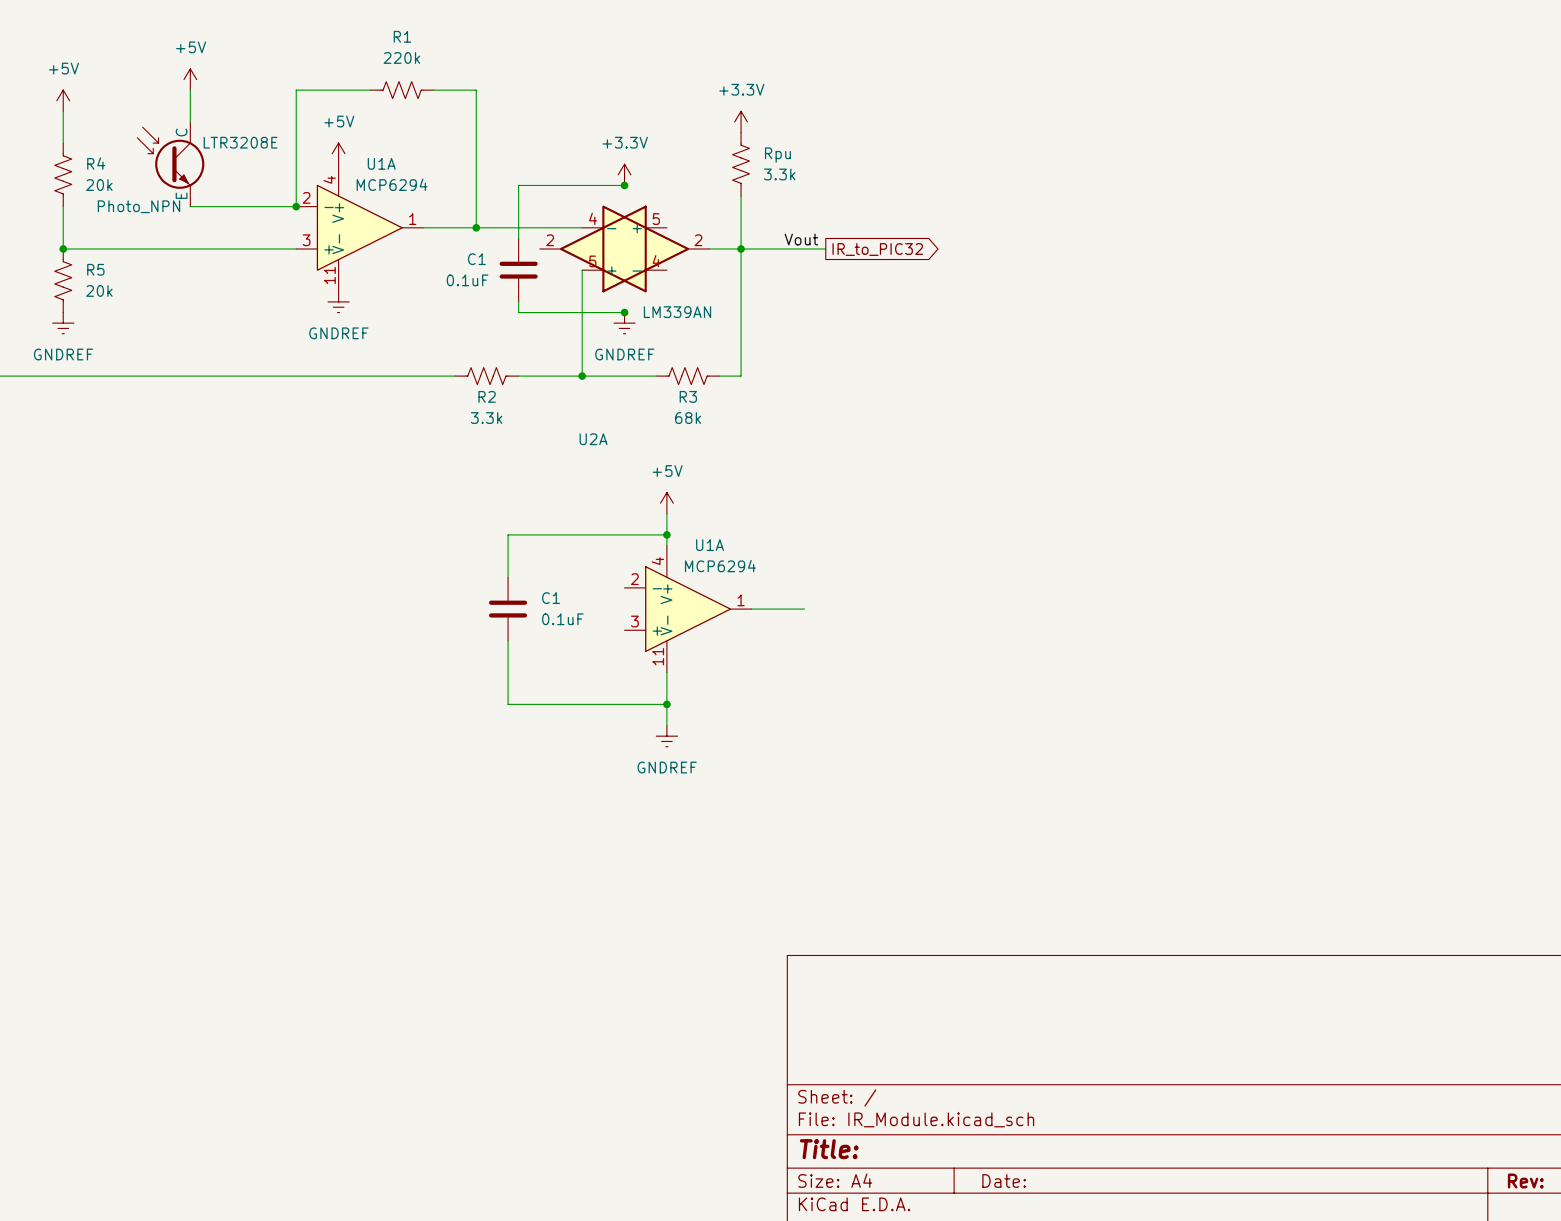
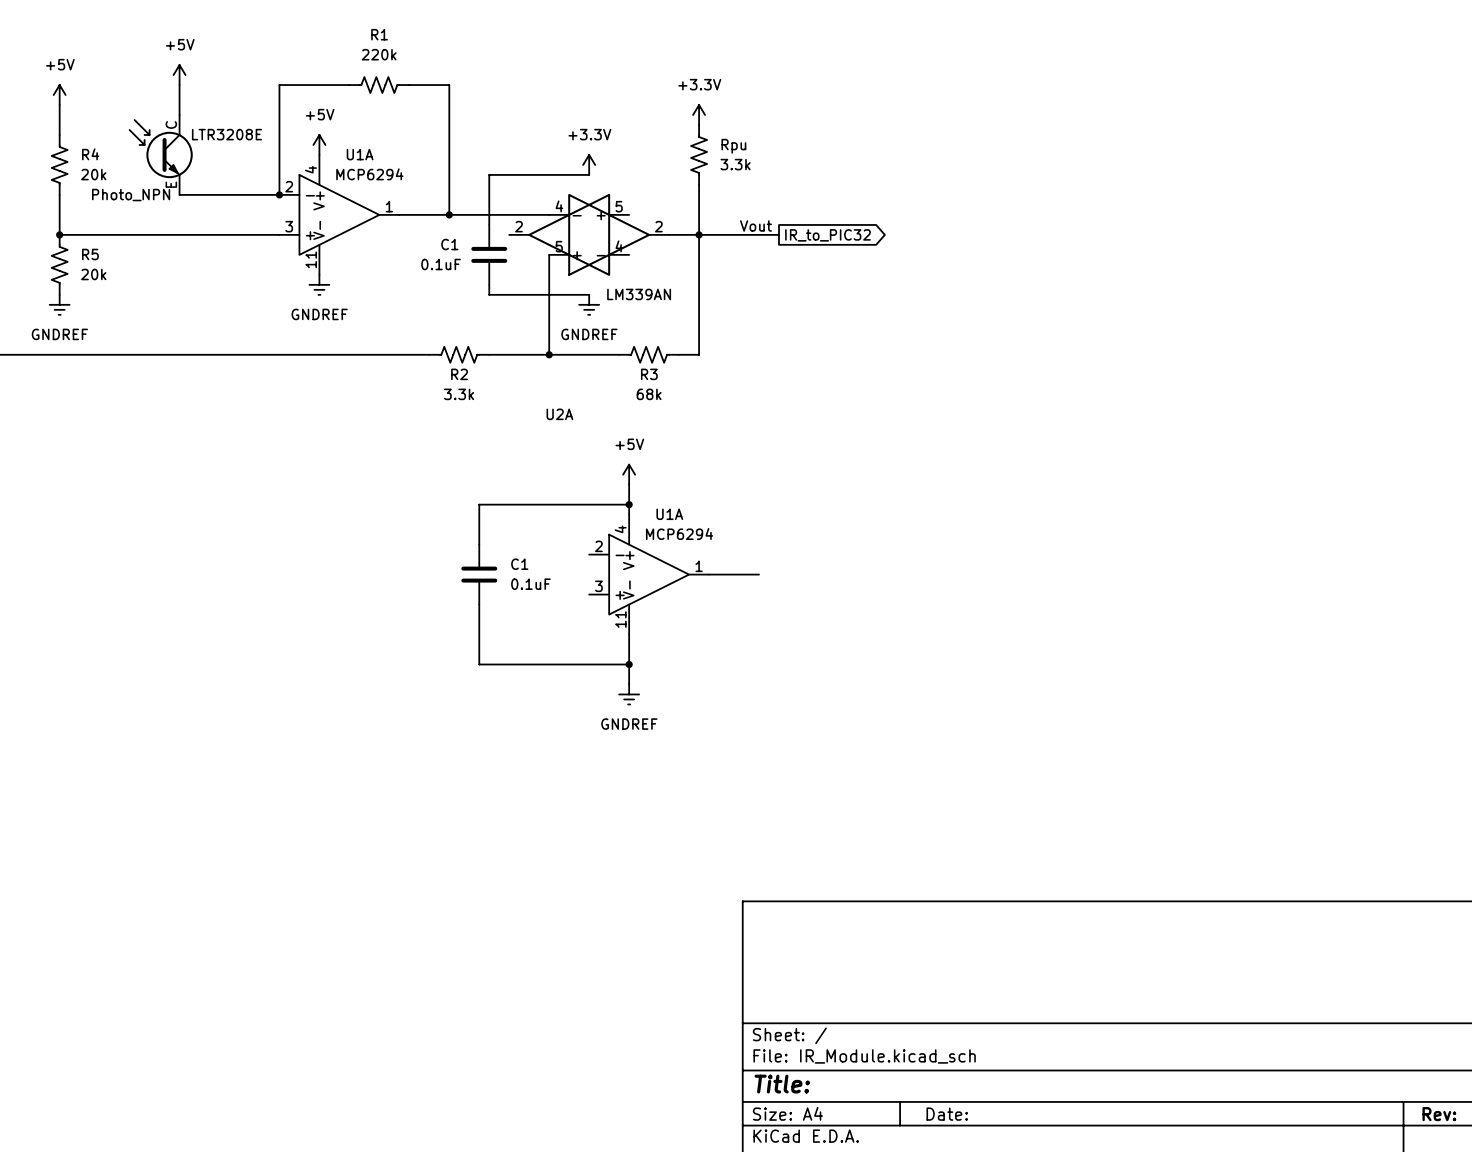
junction: (624, 185) -> none
junction: (624, 312) -> none

